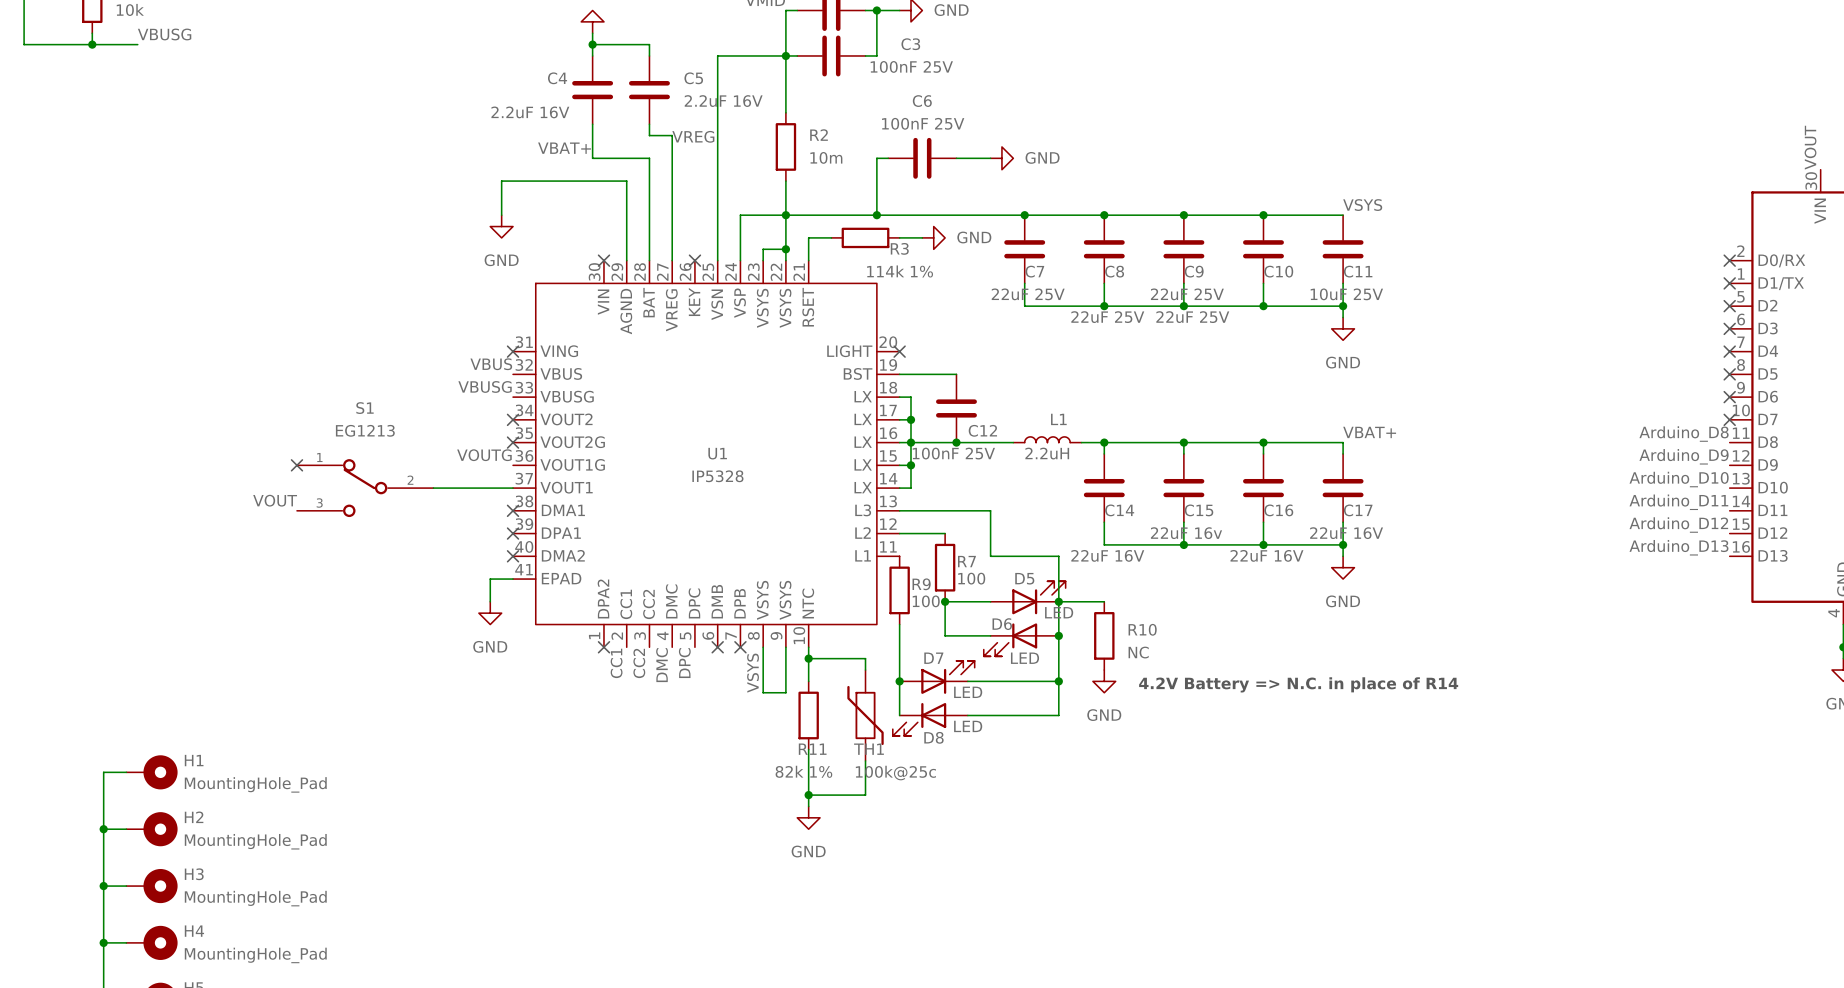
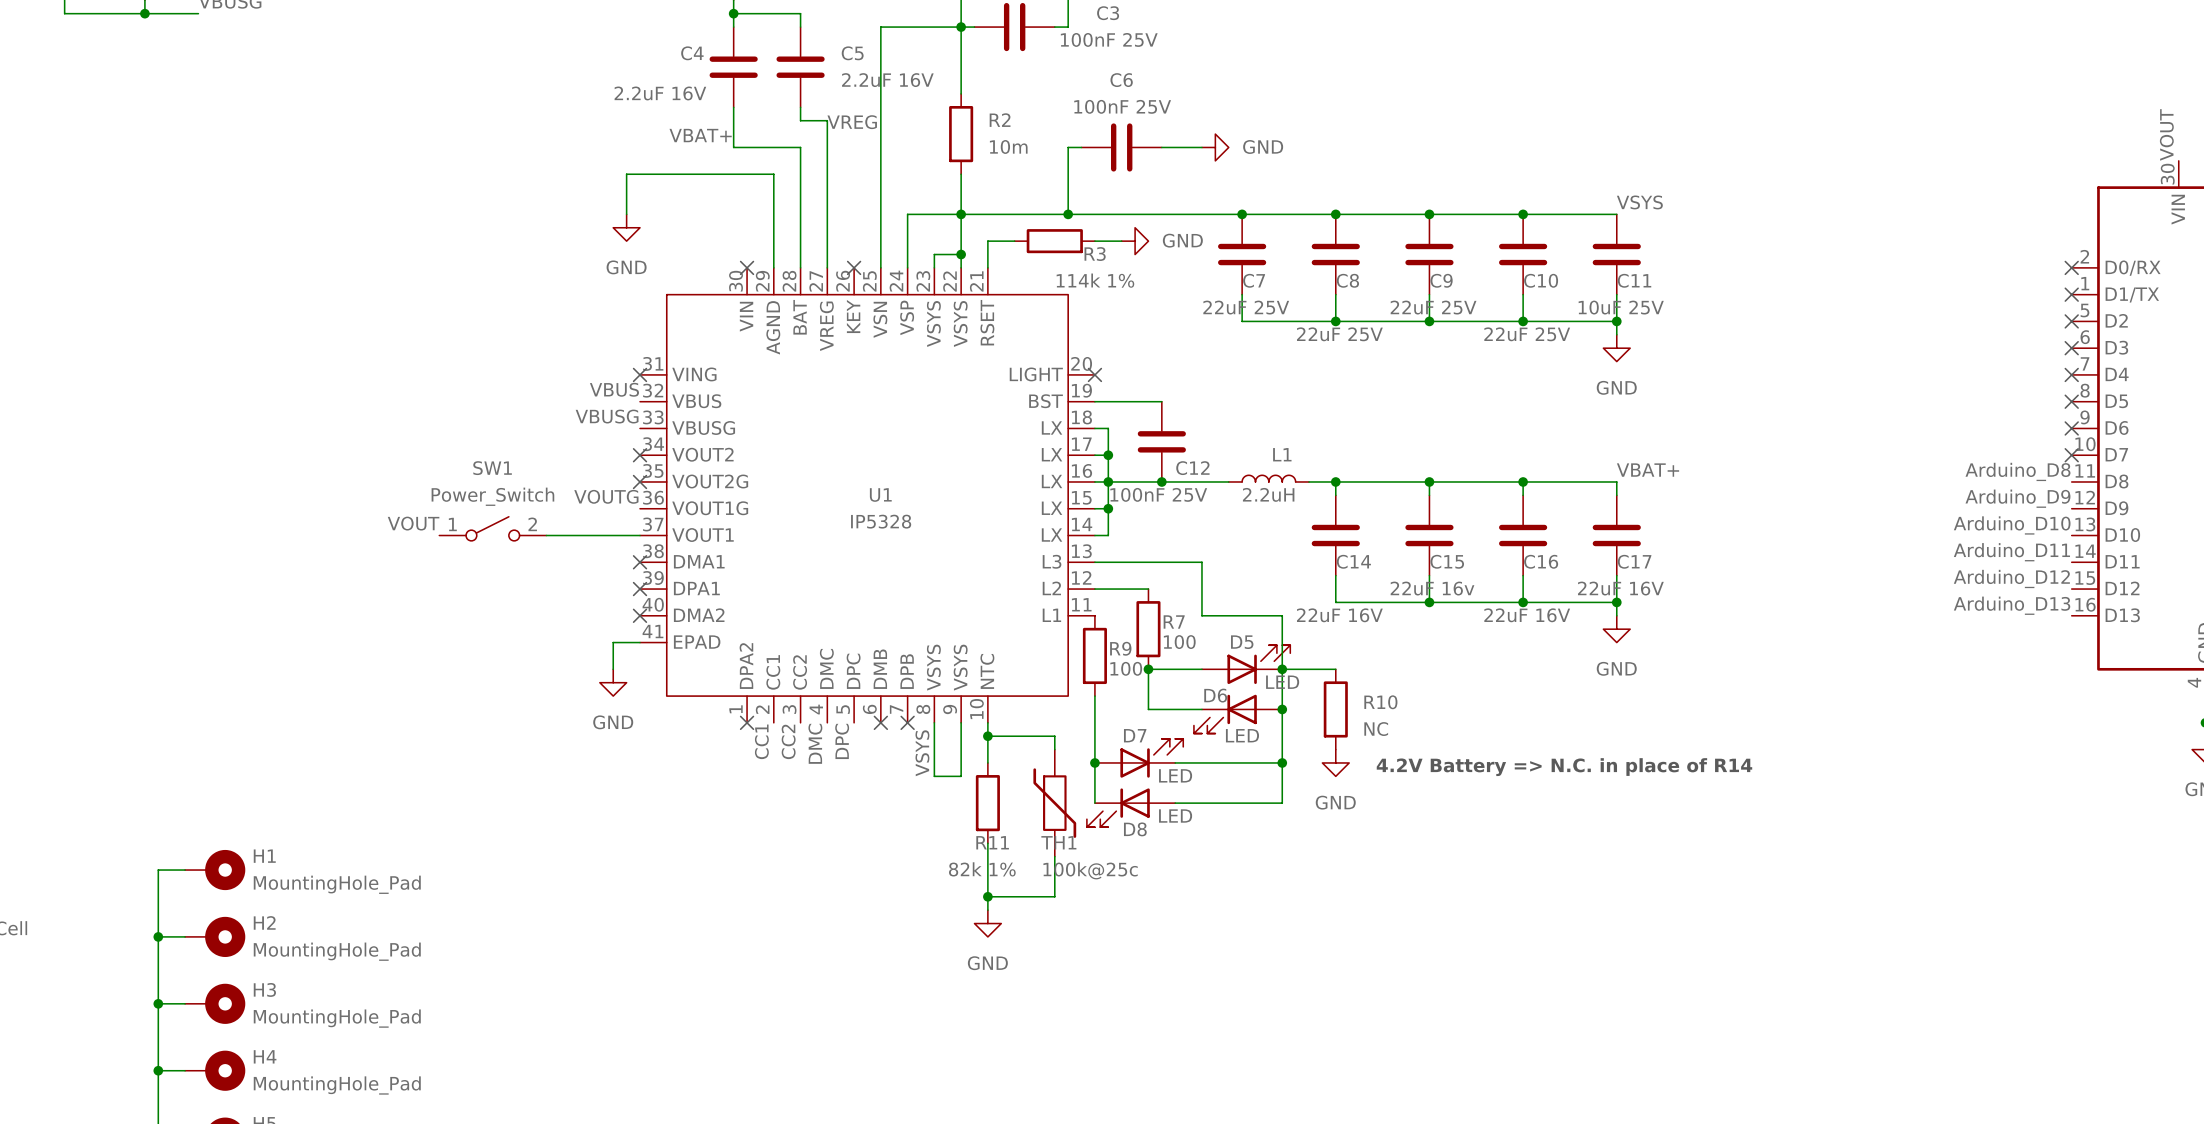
C10 value position: 22uF 25V (1192, 317) -> 22uF 25V (1527, 334)
no-connect mark: (296, 465) -> none
SW1: none -> Power_Switch (492, 528)
S1: EG1213 (365, 488) -> none
label position: VOUT (275, 500) -> VOUT (413, 523)

